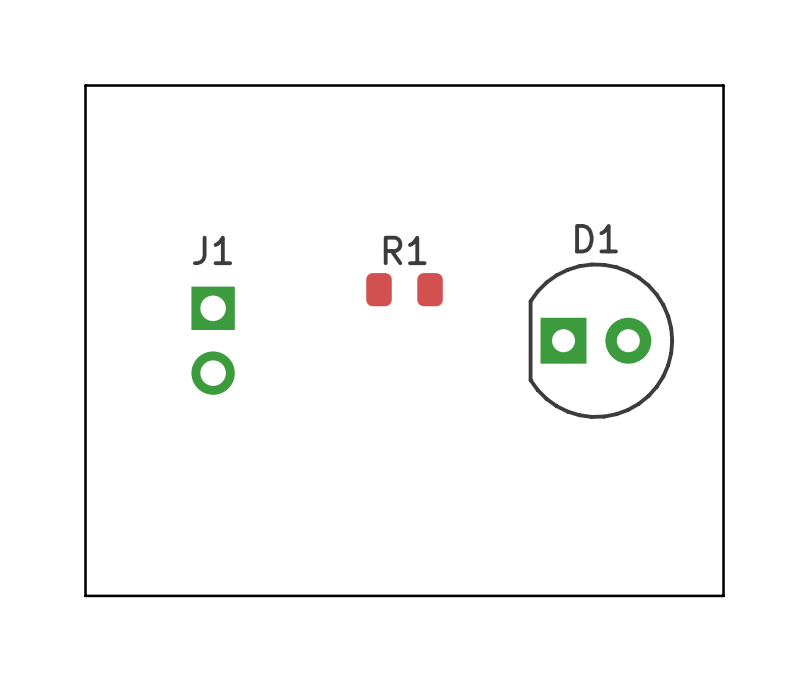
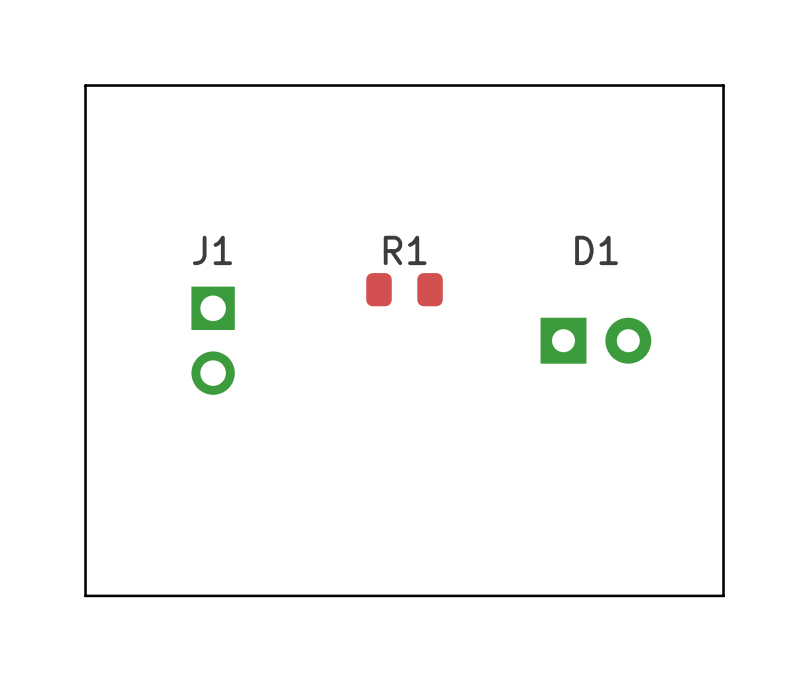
D1 footprint: [528, 262, 675, 419] -> [540, 317, 652, 364]

